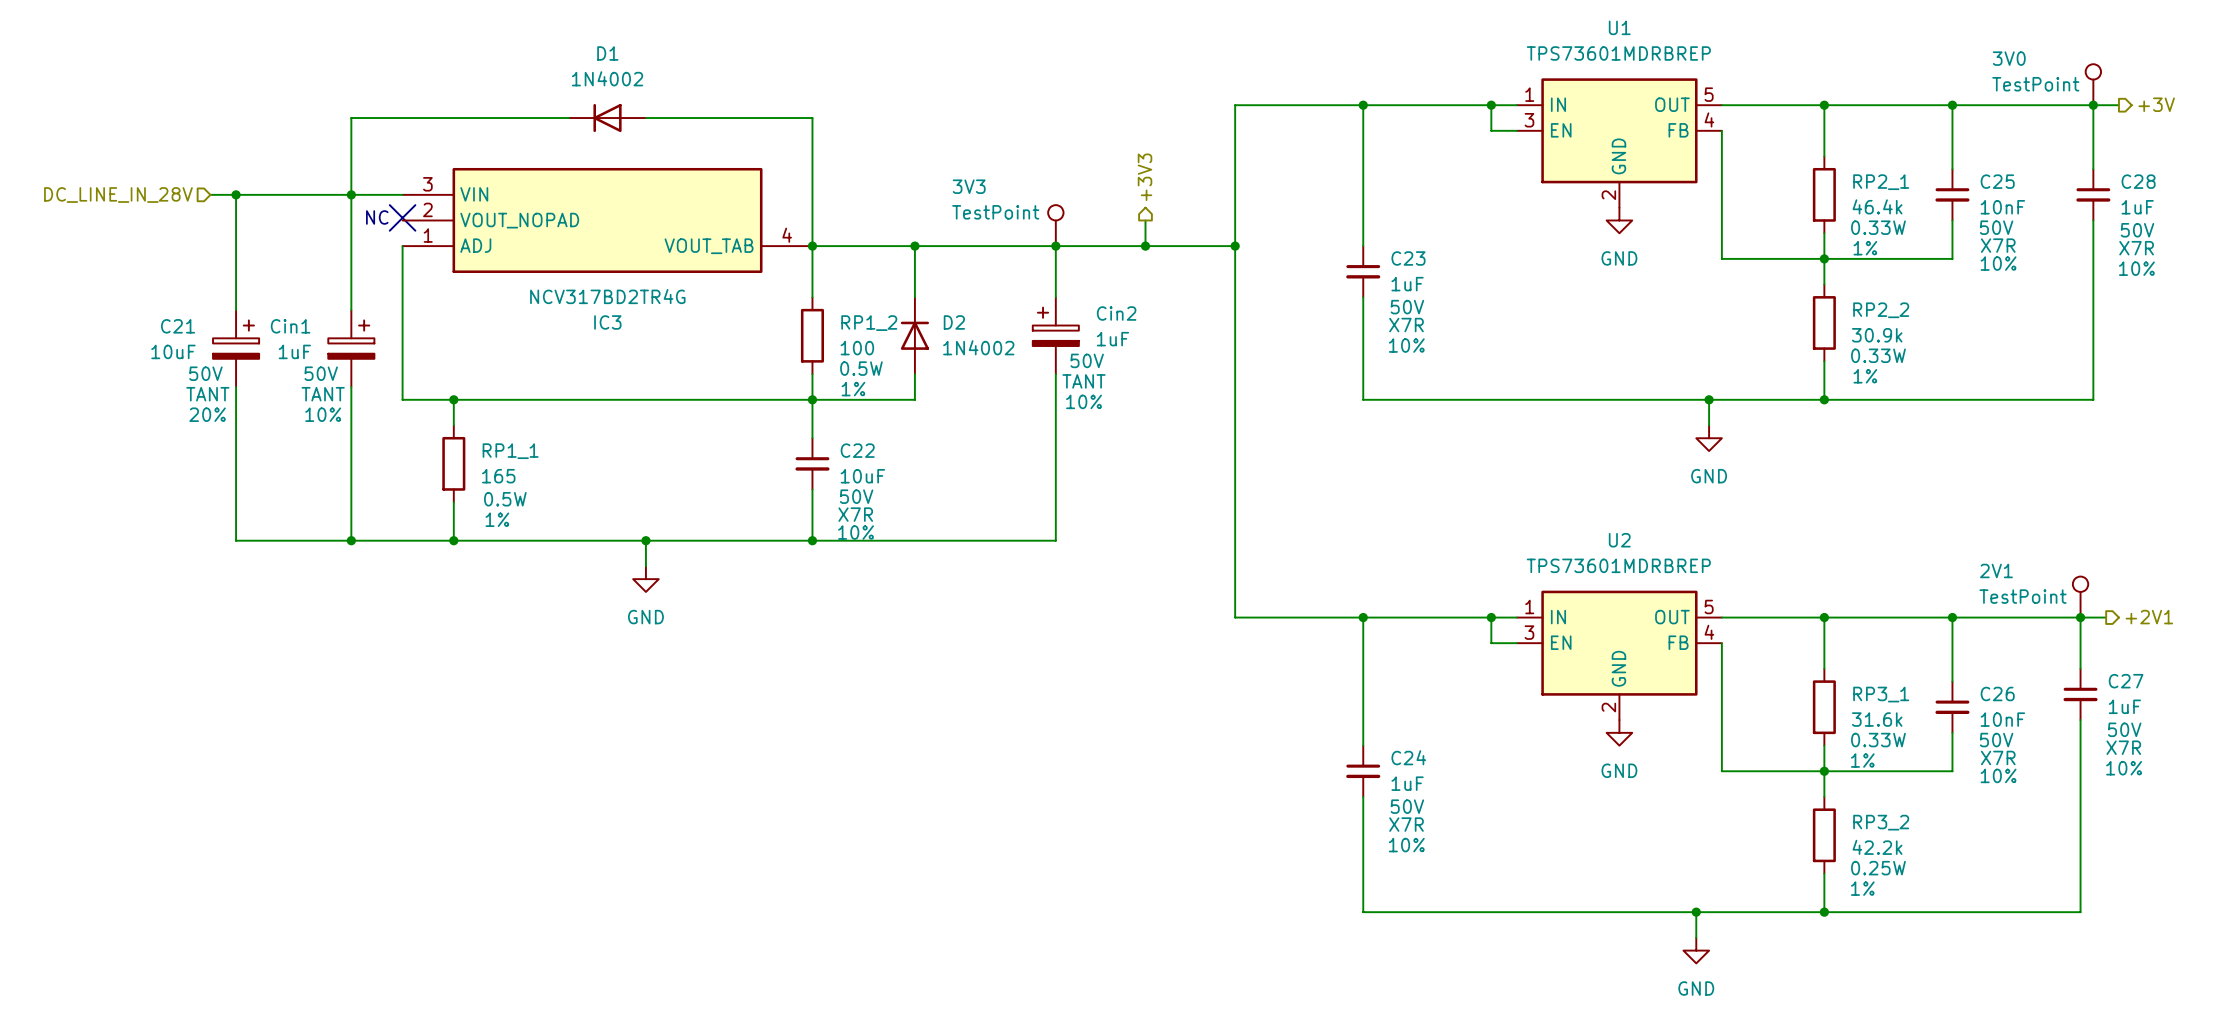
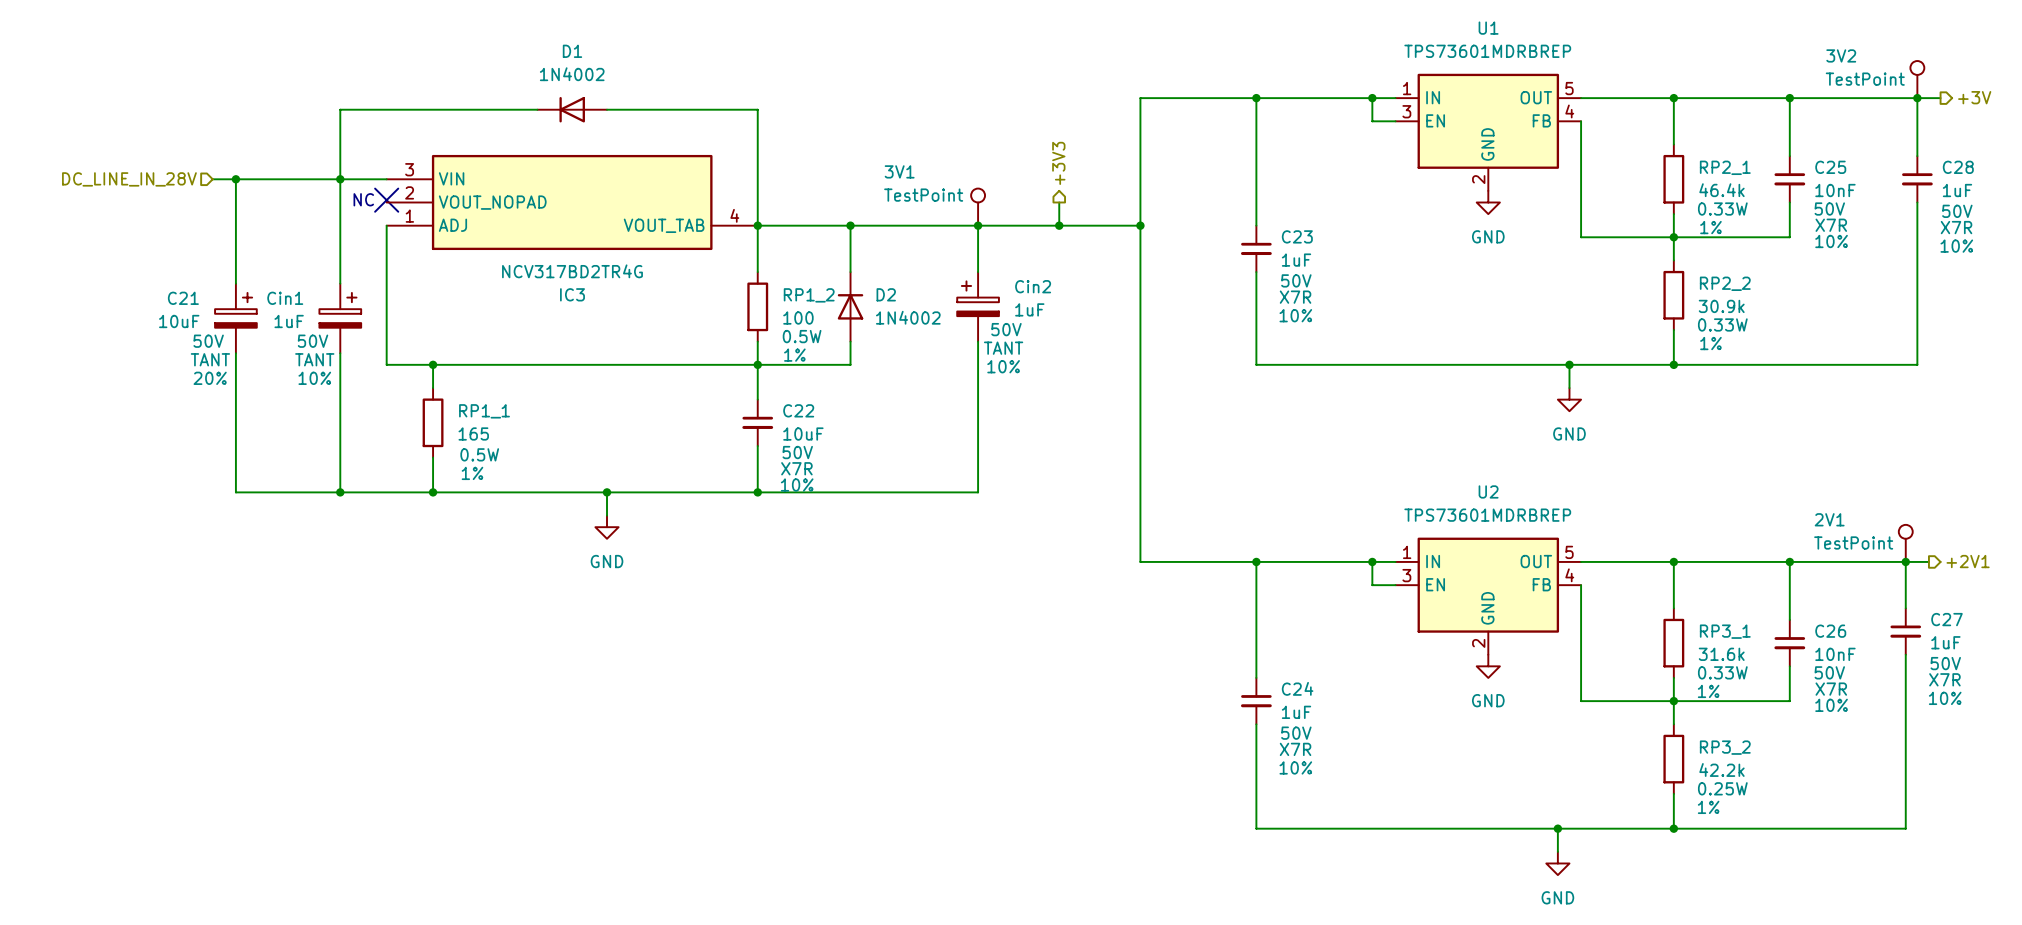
3V0 name: 3V0 (2009, 58) -> 3V2 (1841, 55)
3V3 name: 3V3 (969, 186) -> 3V1 (899, 171)

